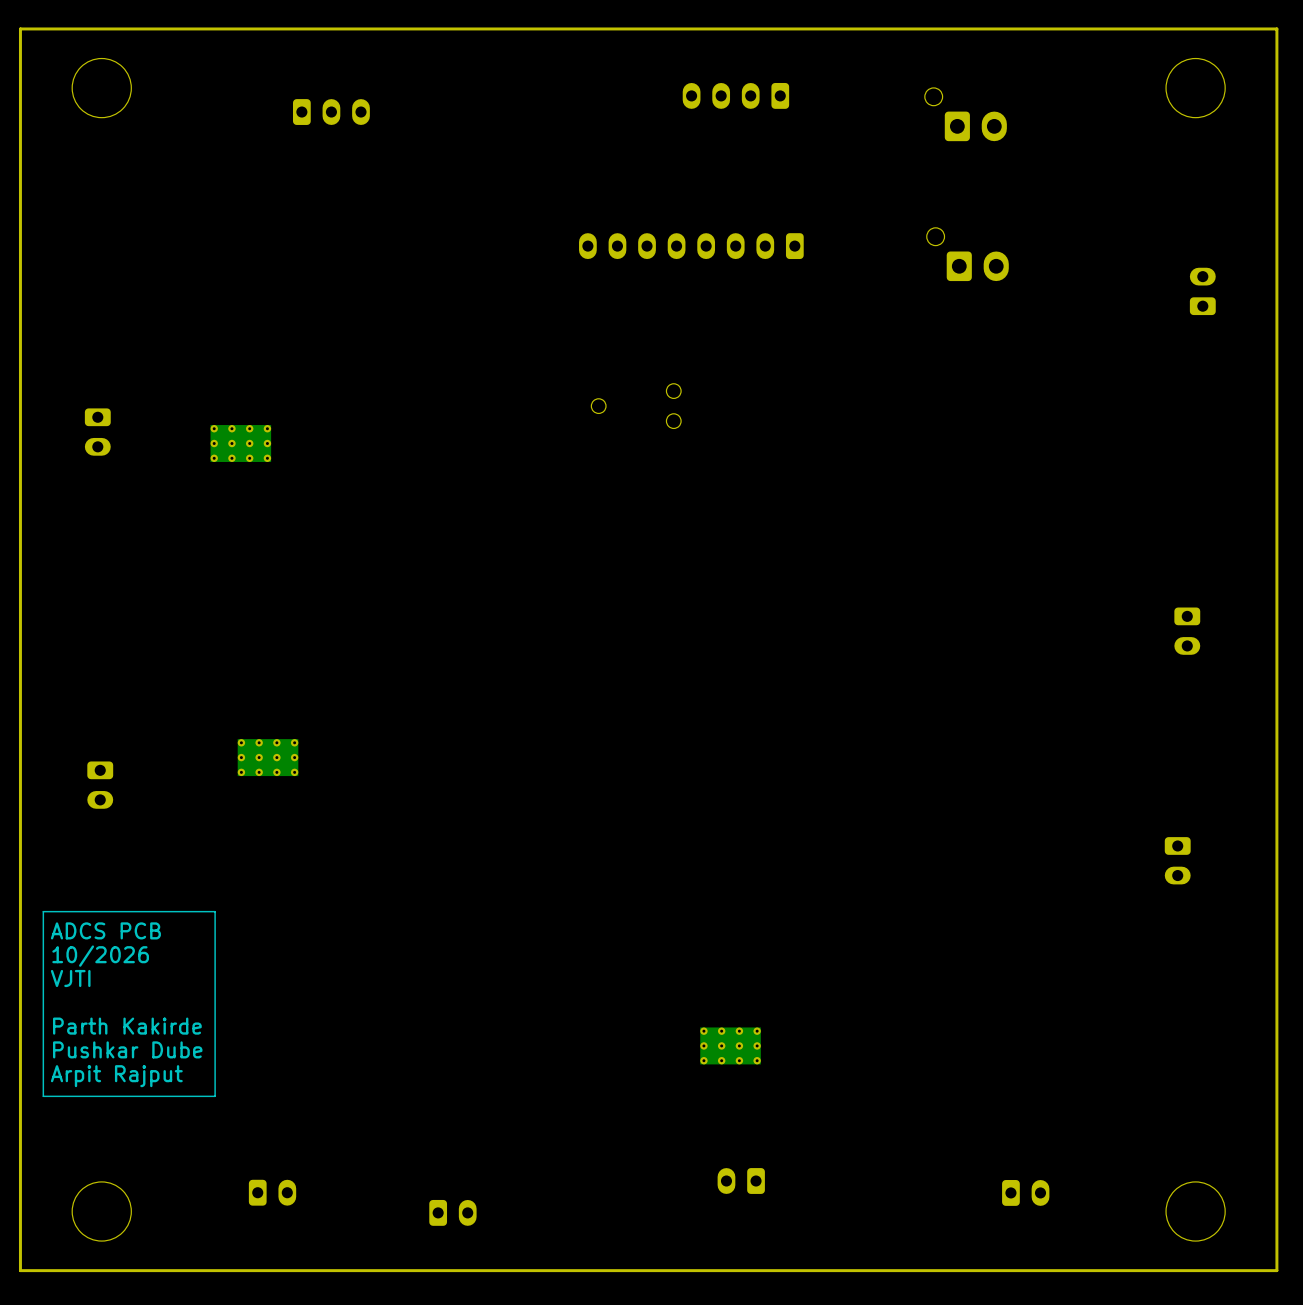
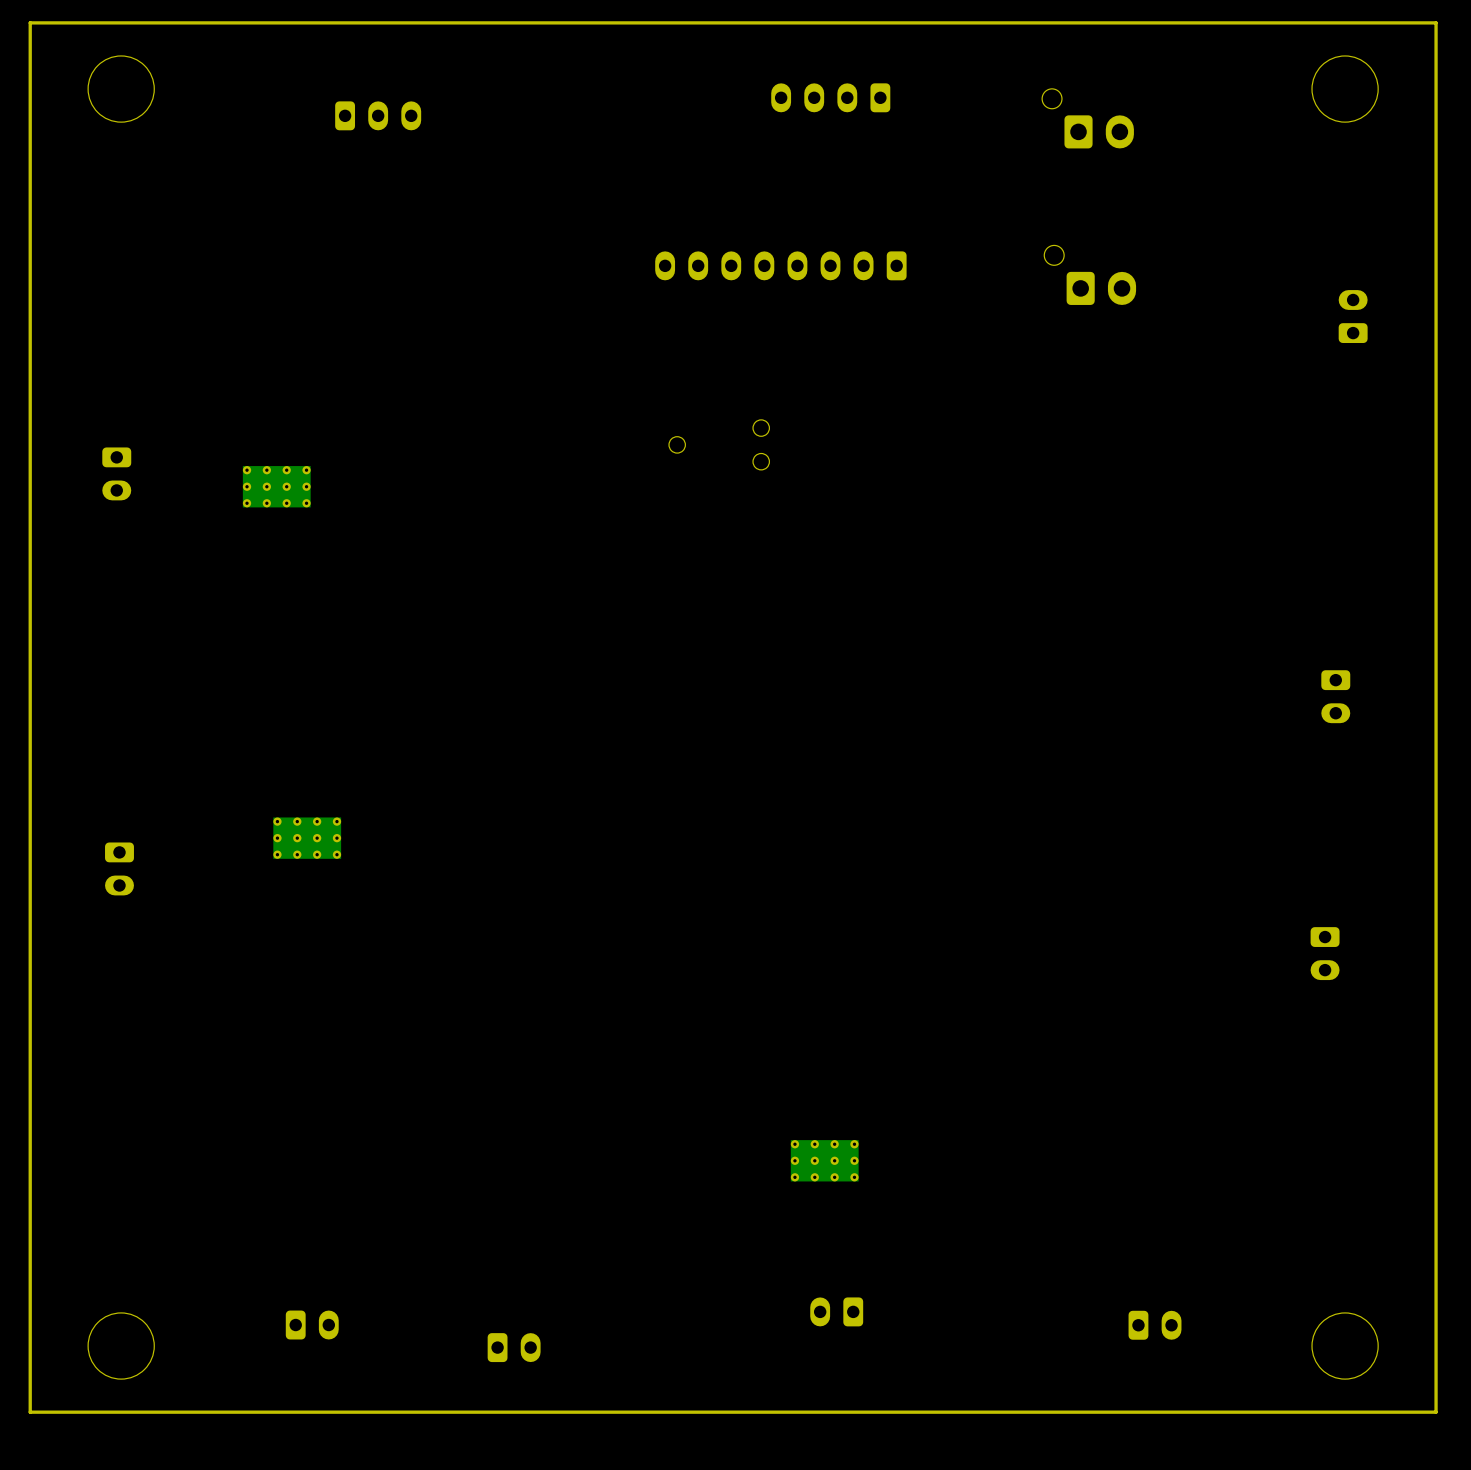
line: (215, 911) (43, 911) (43, 1096) (215, 1096) (215, 911) -> none
text: ADCS PCB (105, 930) -> none
text: 10/2026 (100, 956) -> none
text: VJTI (70, 978) -> none
text: Parth Kakirde (127, 1026) -> none
text: Pushkar Dube (127, 1049) -> none
text: Arpit Rajput (116, 1076) -> none

